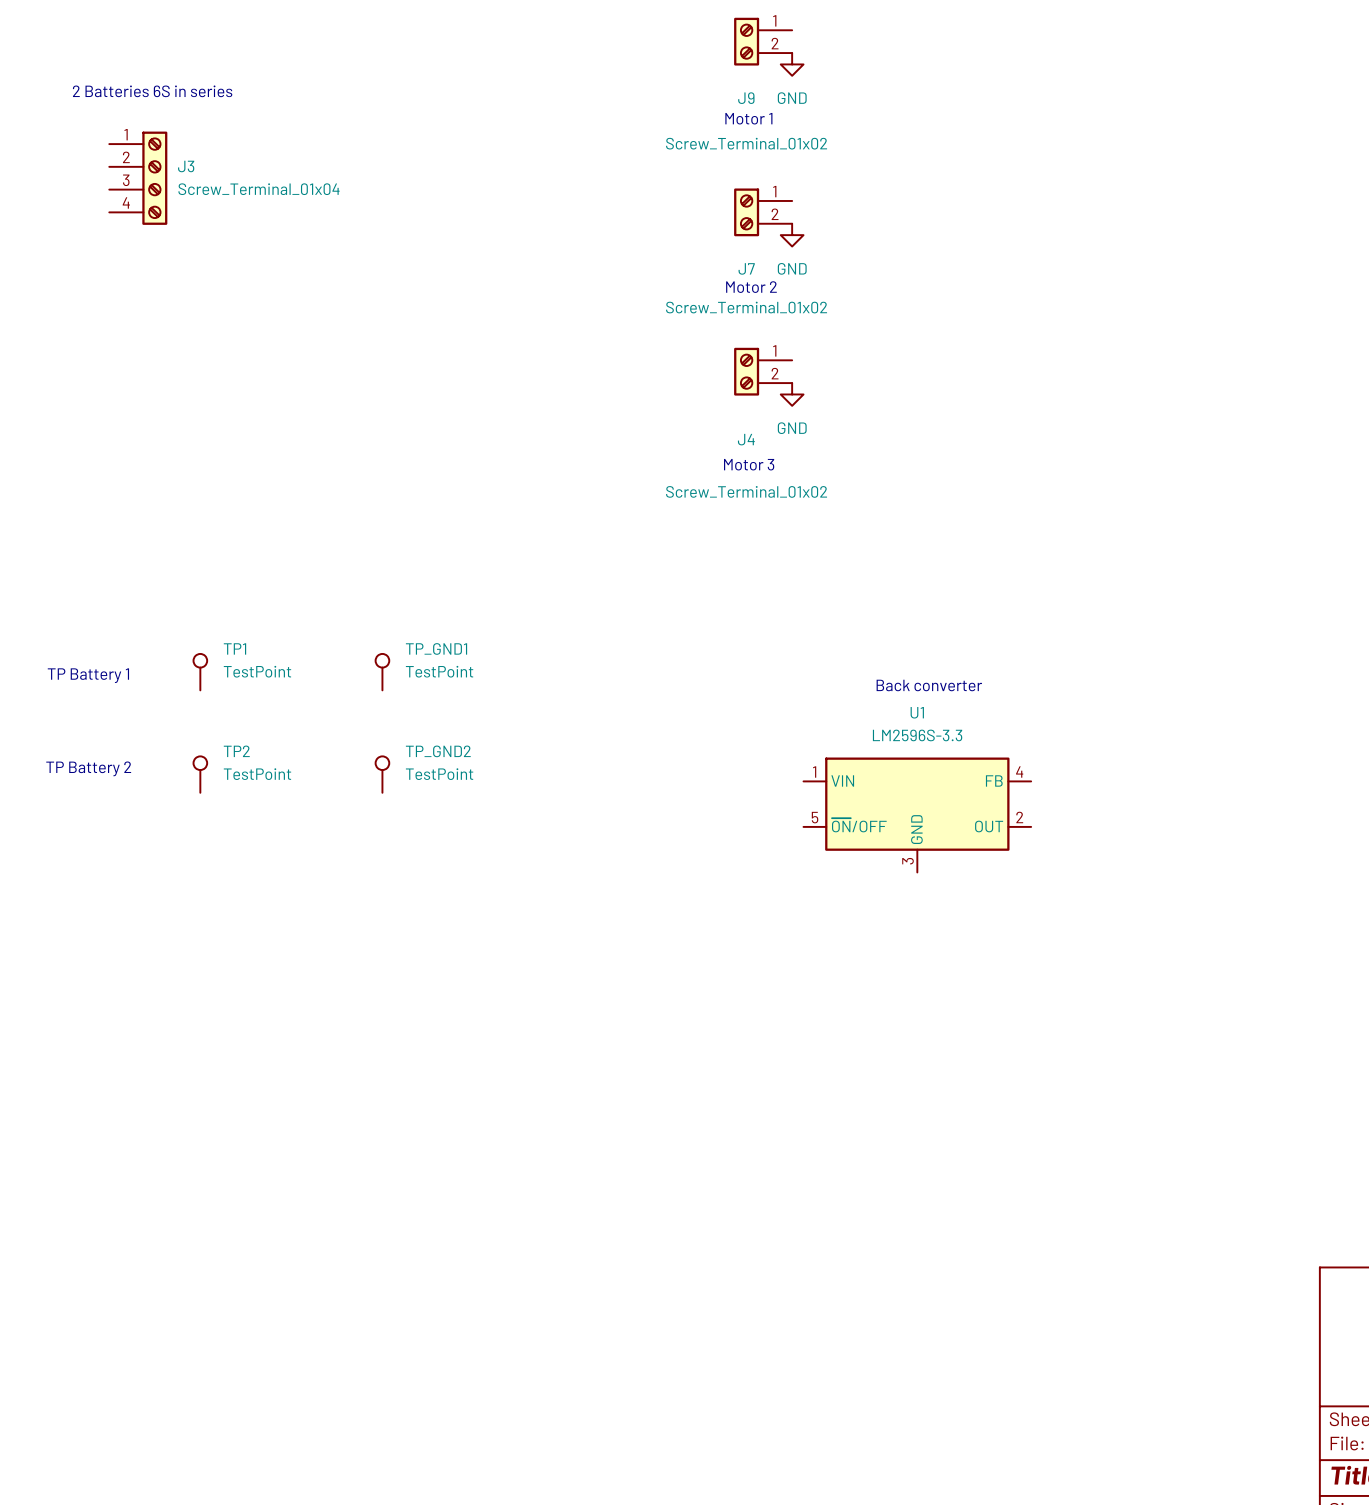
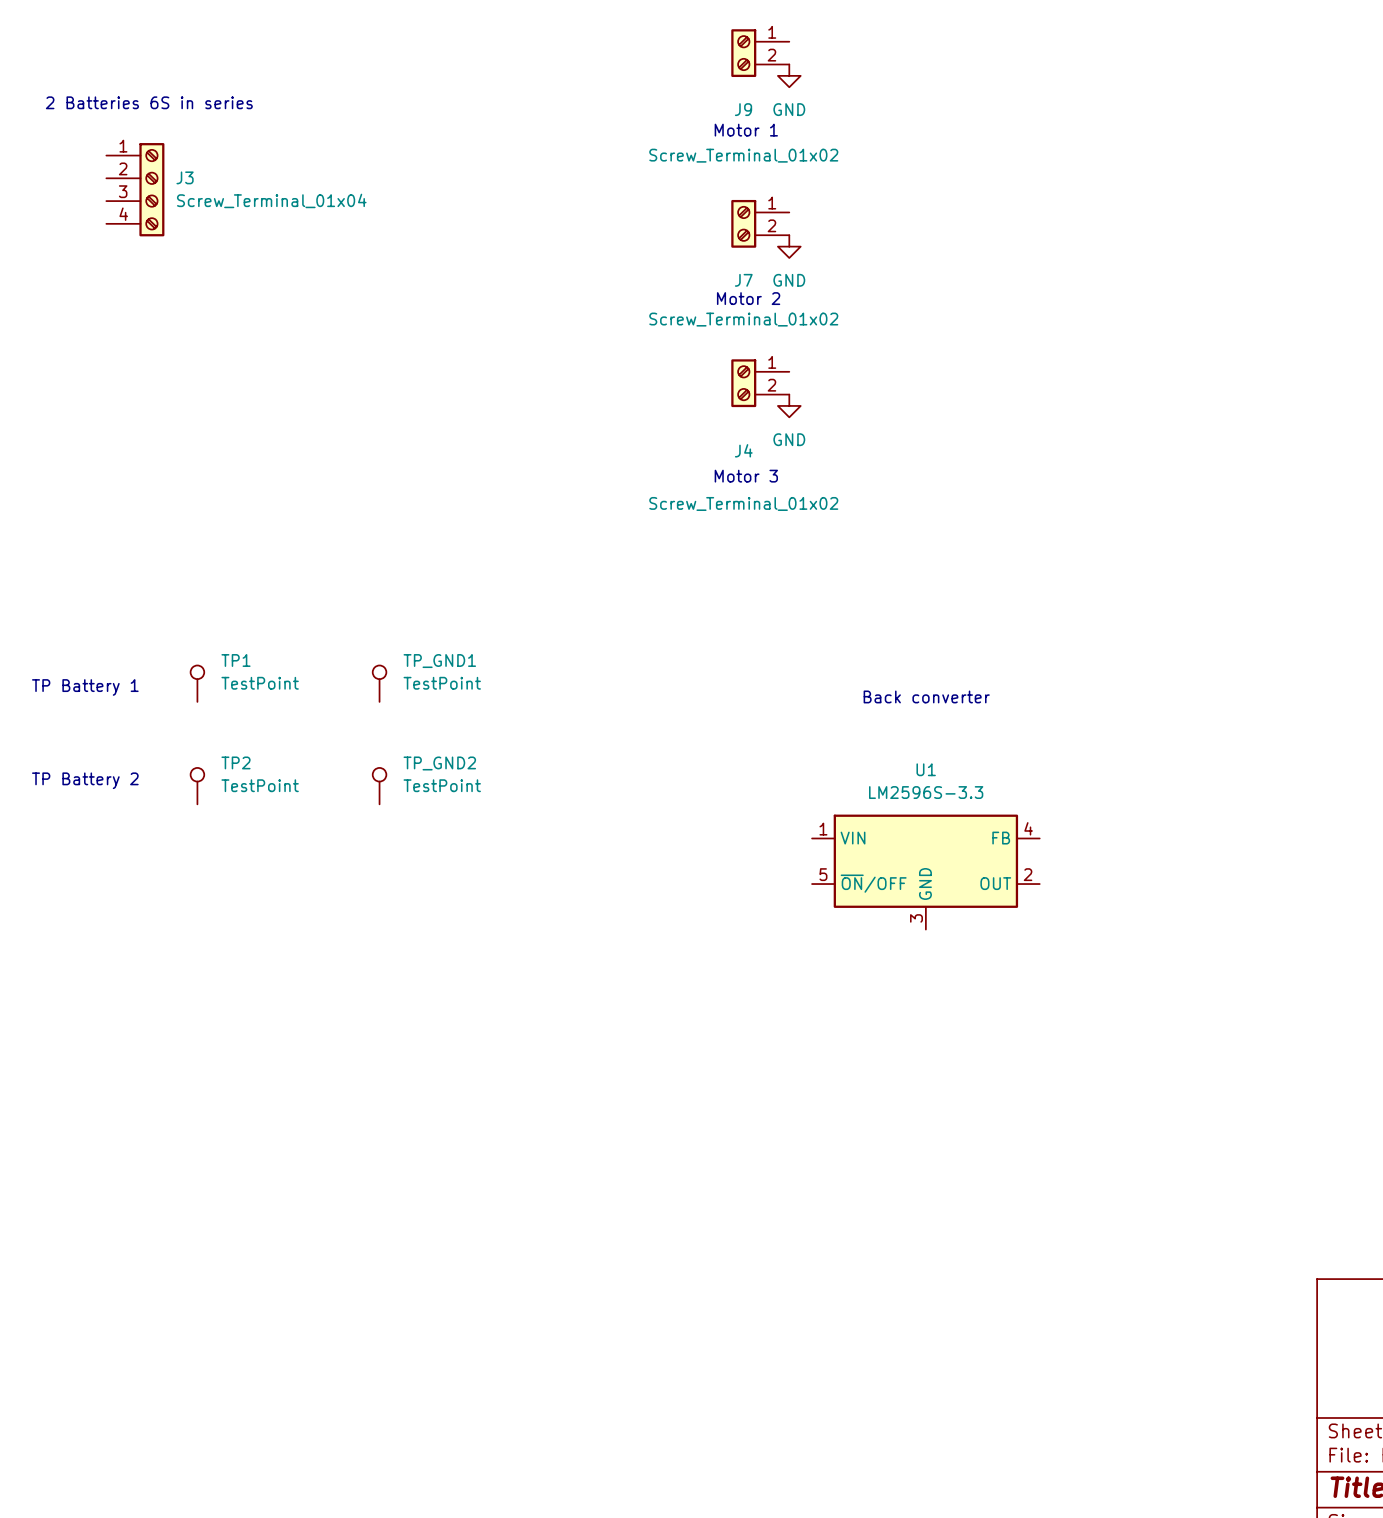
U1 position: (917, 814) -> (925, 872)

